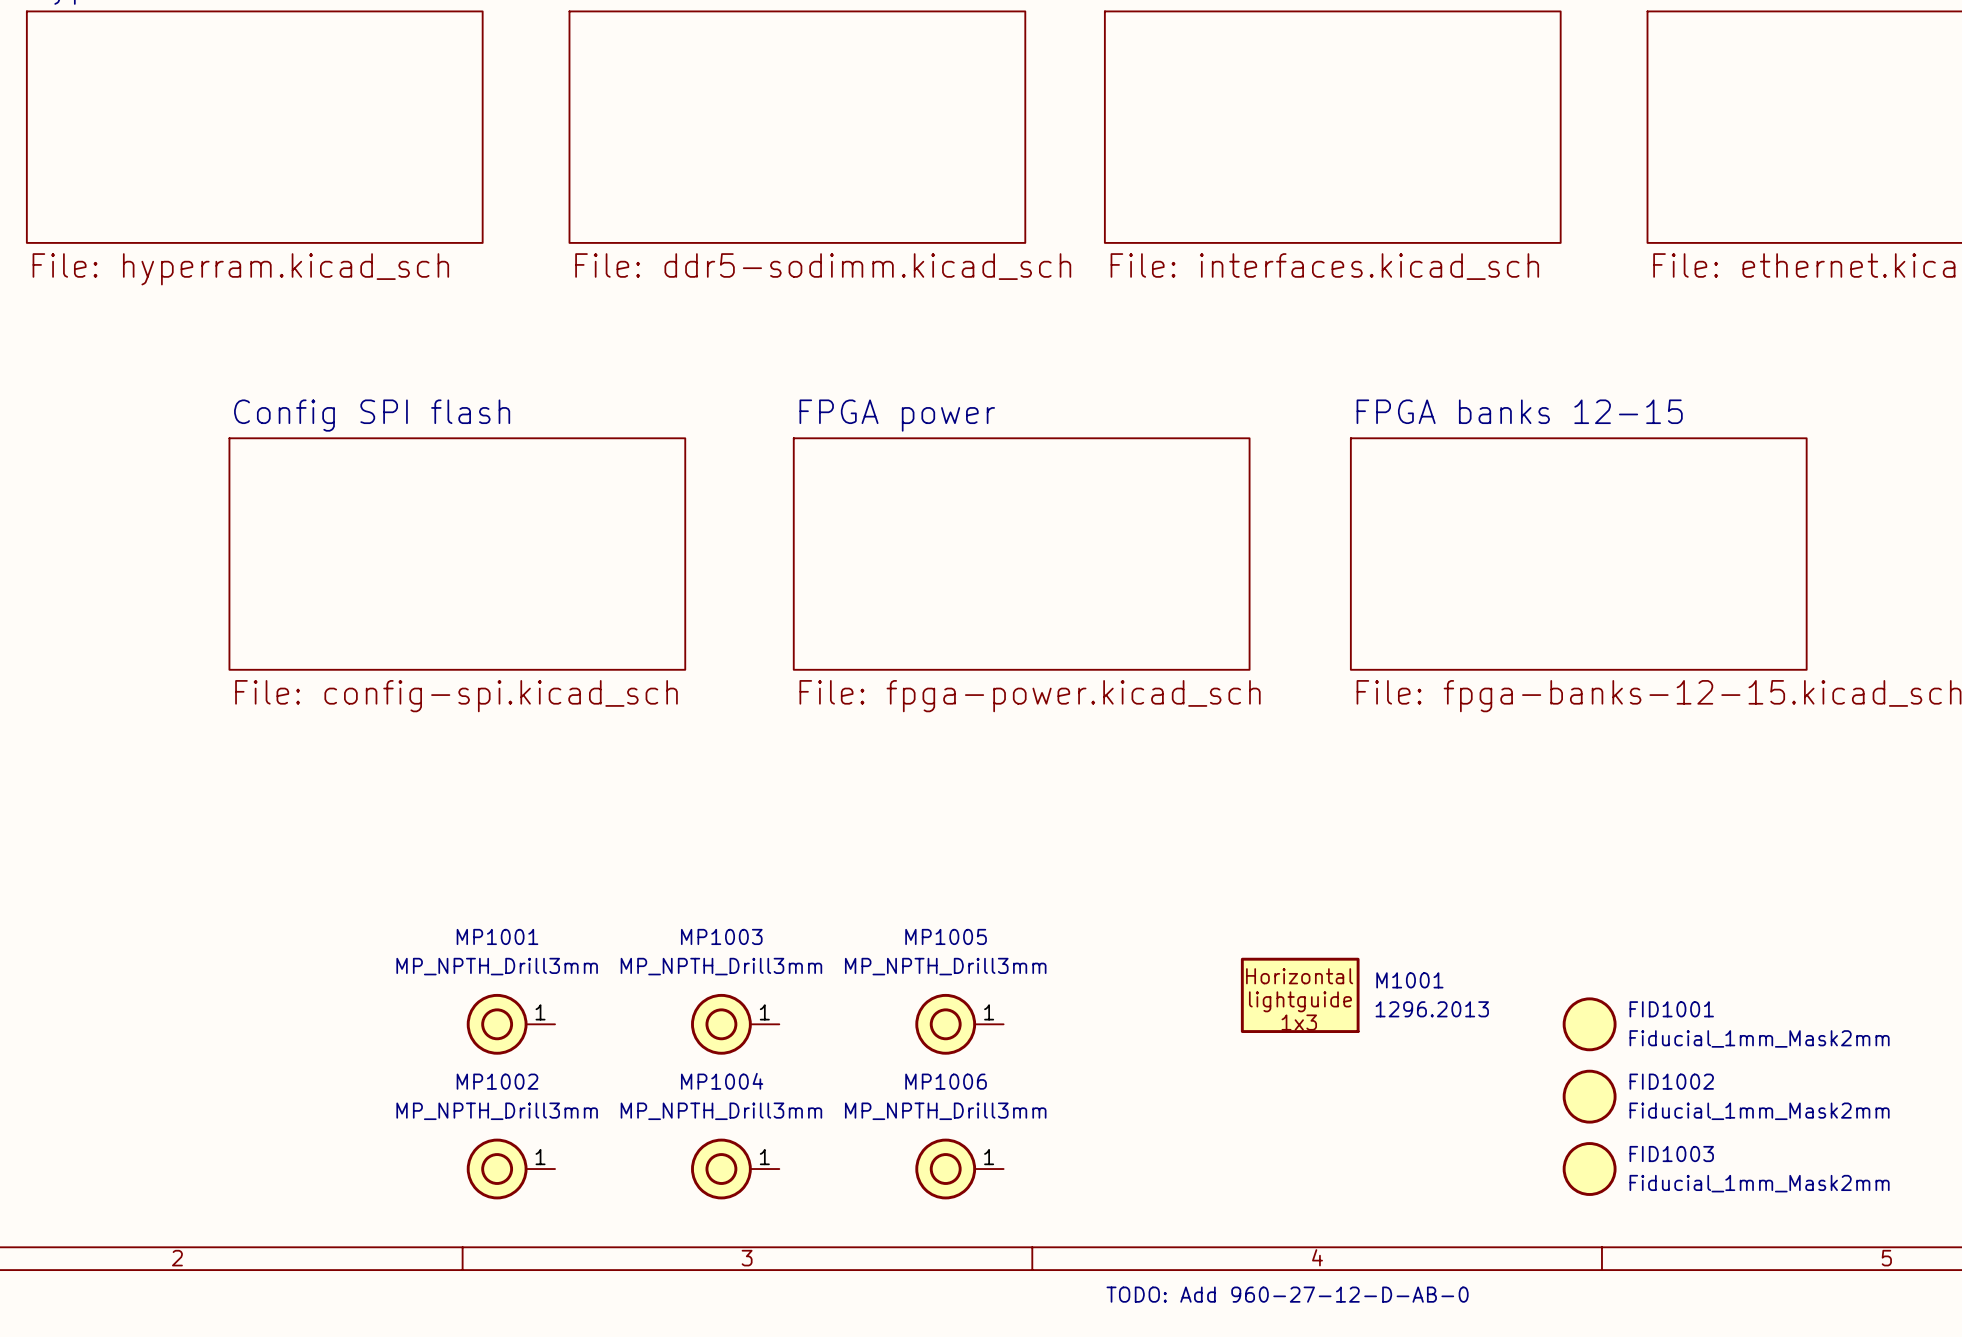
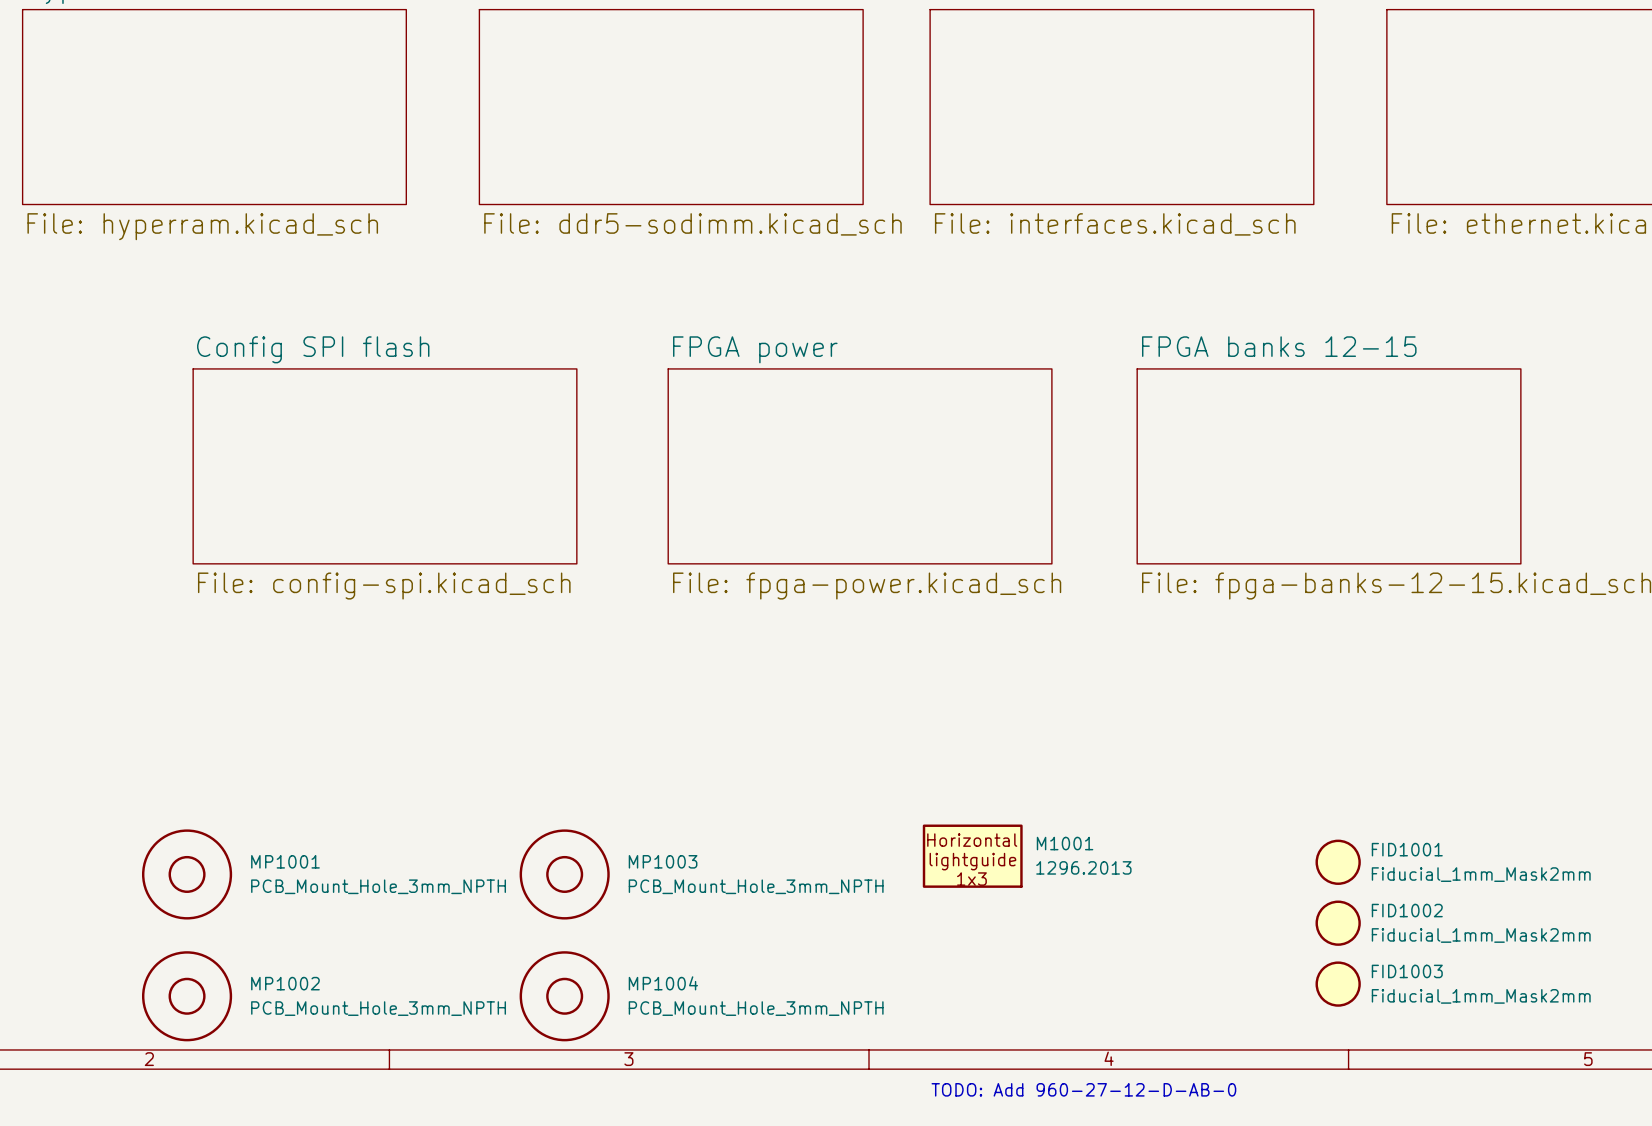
MP1001 name position: MP1001 (497, 936) -> MP1001 (285, 861)
MP1003 name position: MP1003 (721, 936) -> MP1003 (663, 861)
MP1001 value: MP_NPTH_Drill3mm (497, 966) -> PCB_Mount_Hole_3mm_NPTH (378, 886)
MP1003 value: MP_NPTH_Drill3mm (721, 966) -> PCB_Mount_Hole_3mm_NPTH (756, 886)
MP1001 symbol: [466, 993, 556, 1055] -> [141, 829, 233, 920]
MP1003 symbol: [691, 993, 780, 1055] -> [519, 829, 610, 920]
M1001 position: (1300, 995) -> (972, 856)
MP1005: MP_NPTH_Drill3mm (959, 1024) -> none
MP1002 name position: MP1002 (497, 1081) -> MP1002 (285, 983)
MP1004 name position: MP1004 (722, 1081) -> MP1004 (663, 983)
MP1002 value: MP_NPTH_Drill3mm (497, 1111) -> PCB_Mount_Hole_3mm_NPTH (378, 1008)
MP1004 value: MP_NPTH_Drill3mm (721, 1111) -> PCB_Mount_Hole_3mm_NPTH (756, 1008)
MP1002 symbol: [466, 1138, 556, 1200] -> [141, 951, 233, 1042]
MP1004 symbol: [691, 1138, 780, 1200] -> [519, 951, 610, 1042]
MP1006: MP_NPTH_Drill3mm (959, 1169) -> none

